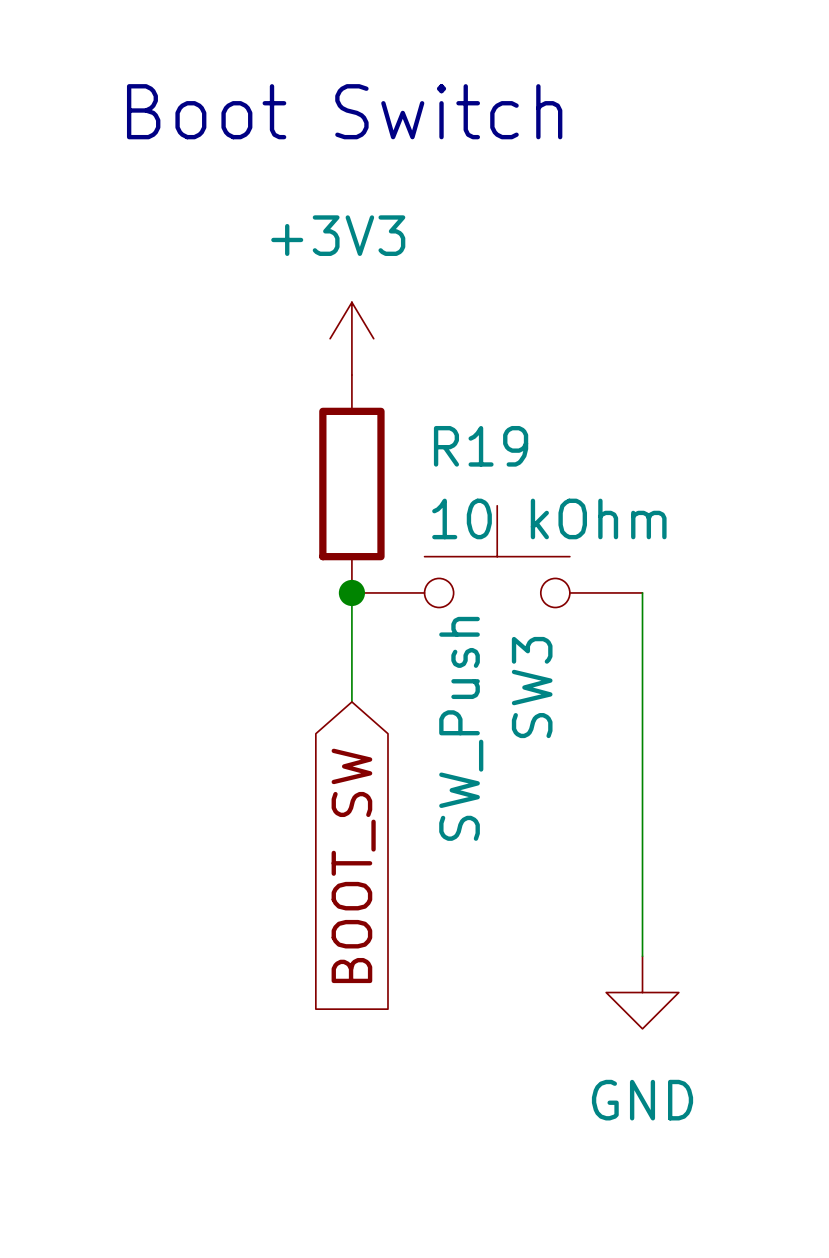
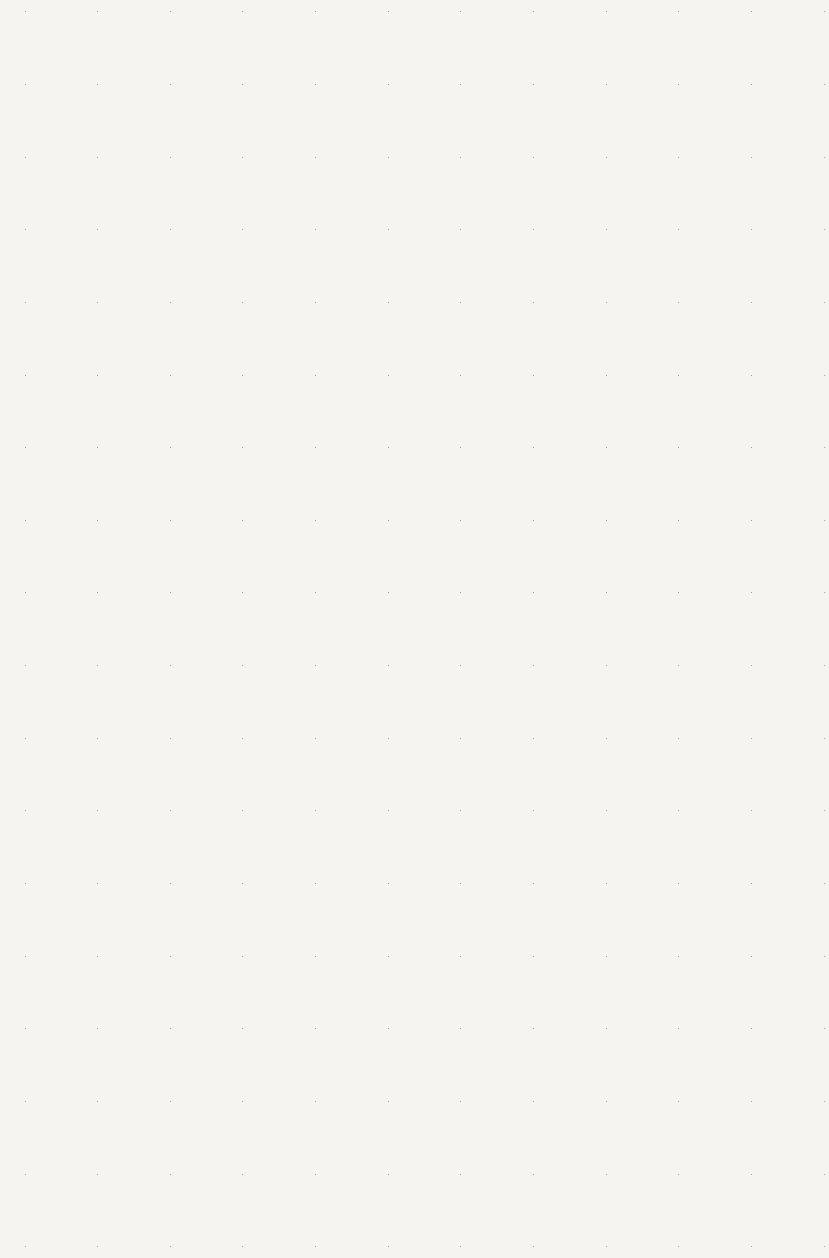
text: Boot Switch (344, 111) -> none
power symbol: +3V3 (351, 338) -> none
R19: 10 kOhm (351, 484) -> none
SW3: SW_Push (497, 556) -> none
wire: (351, 592) (351, 701) -> none
junction: (351, 592) -> none
wire: (642, 592) (642, 956) -> none
global label: BOOT_SW (353, 865) -> none
power symbol: GND (642, 992) -> none

